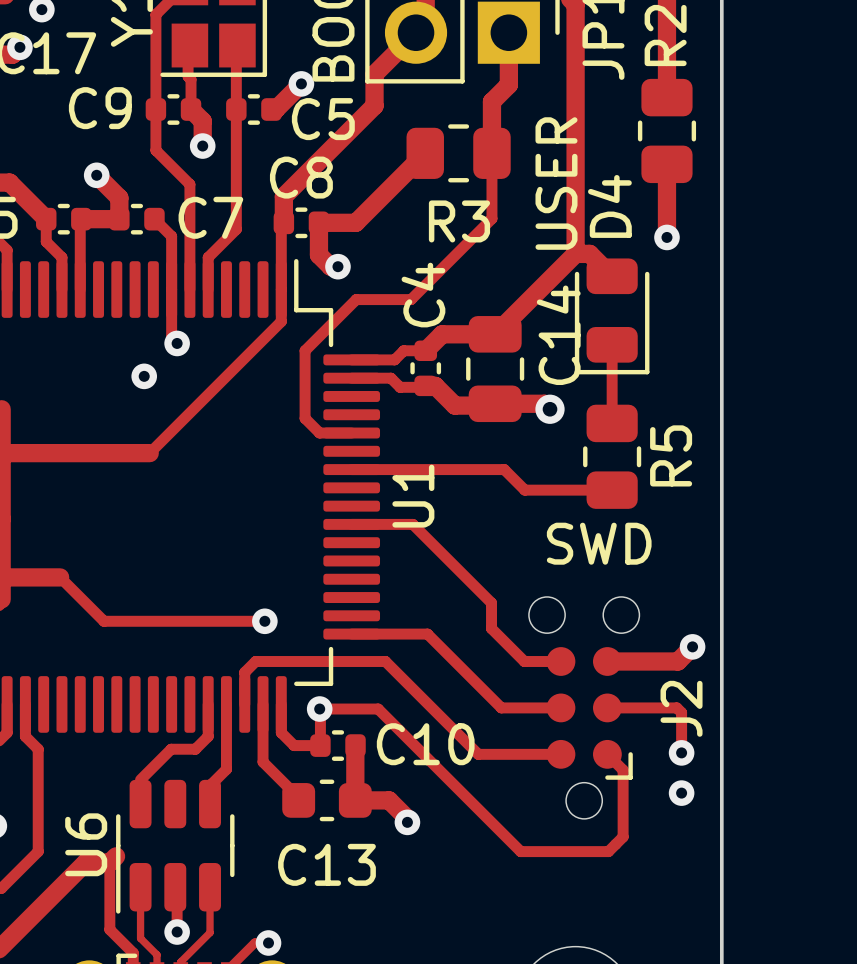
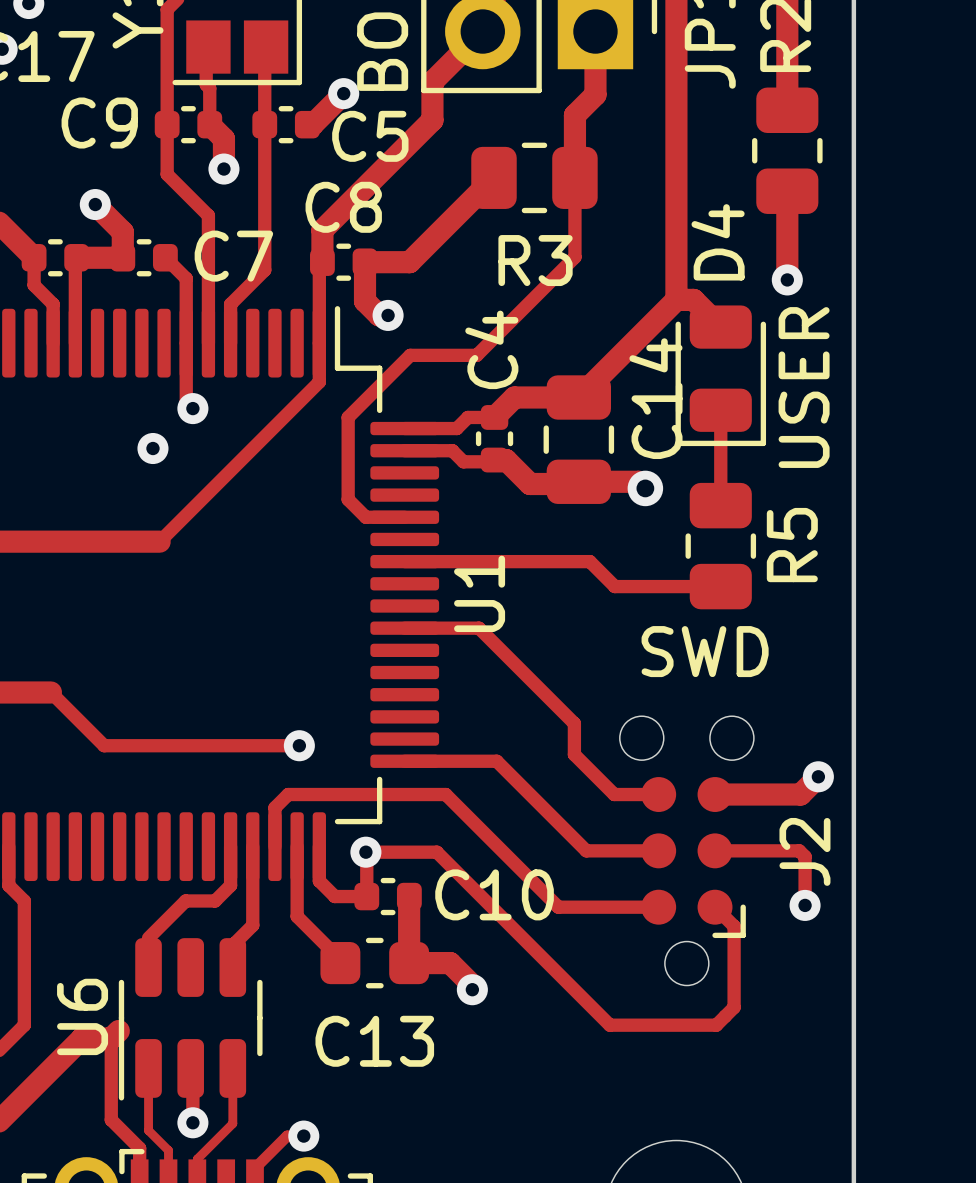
text position: USER (556, 183) -> USER (804, 387)
via: (681, 793) -> none

